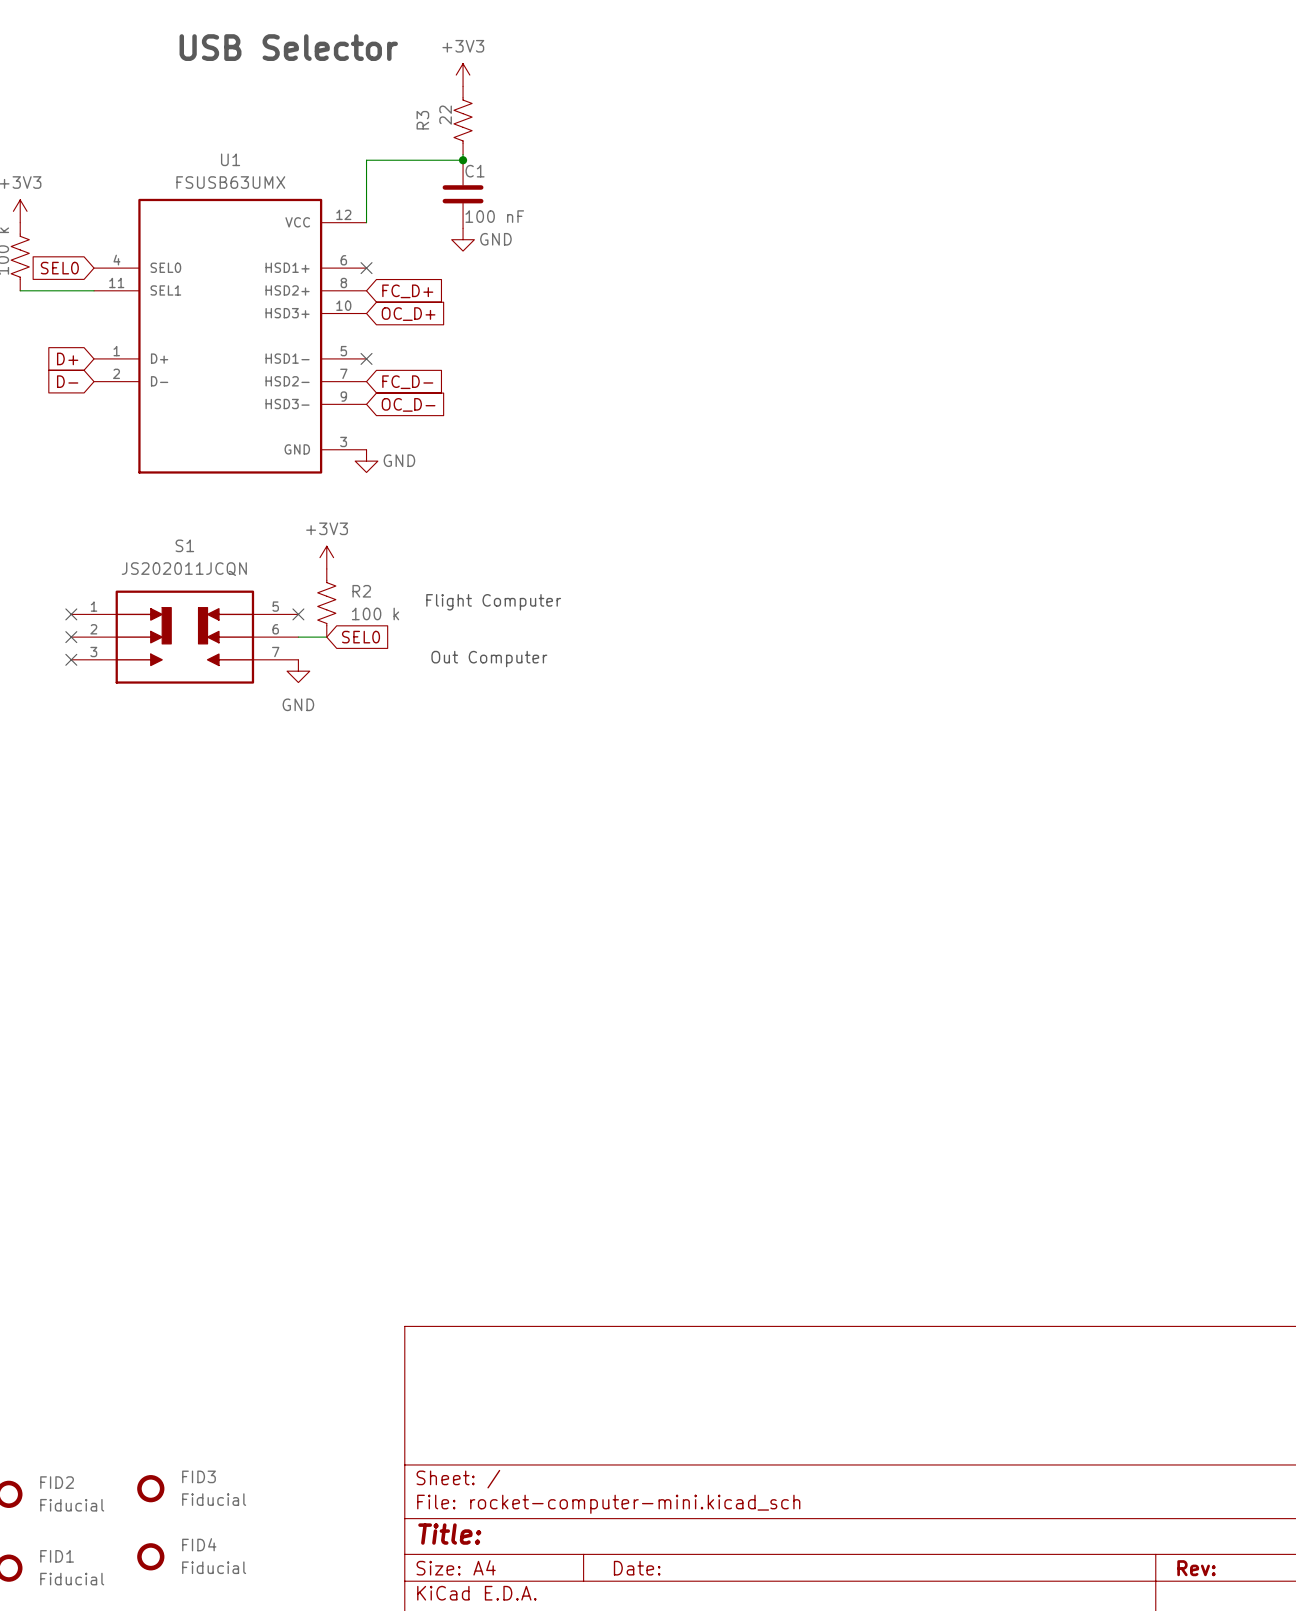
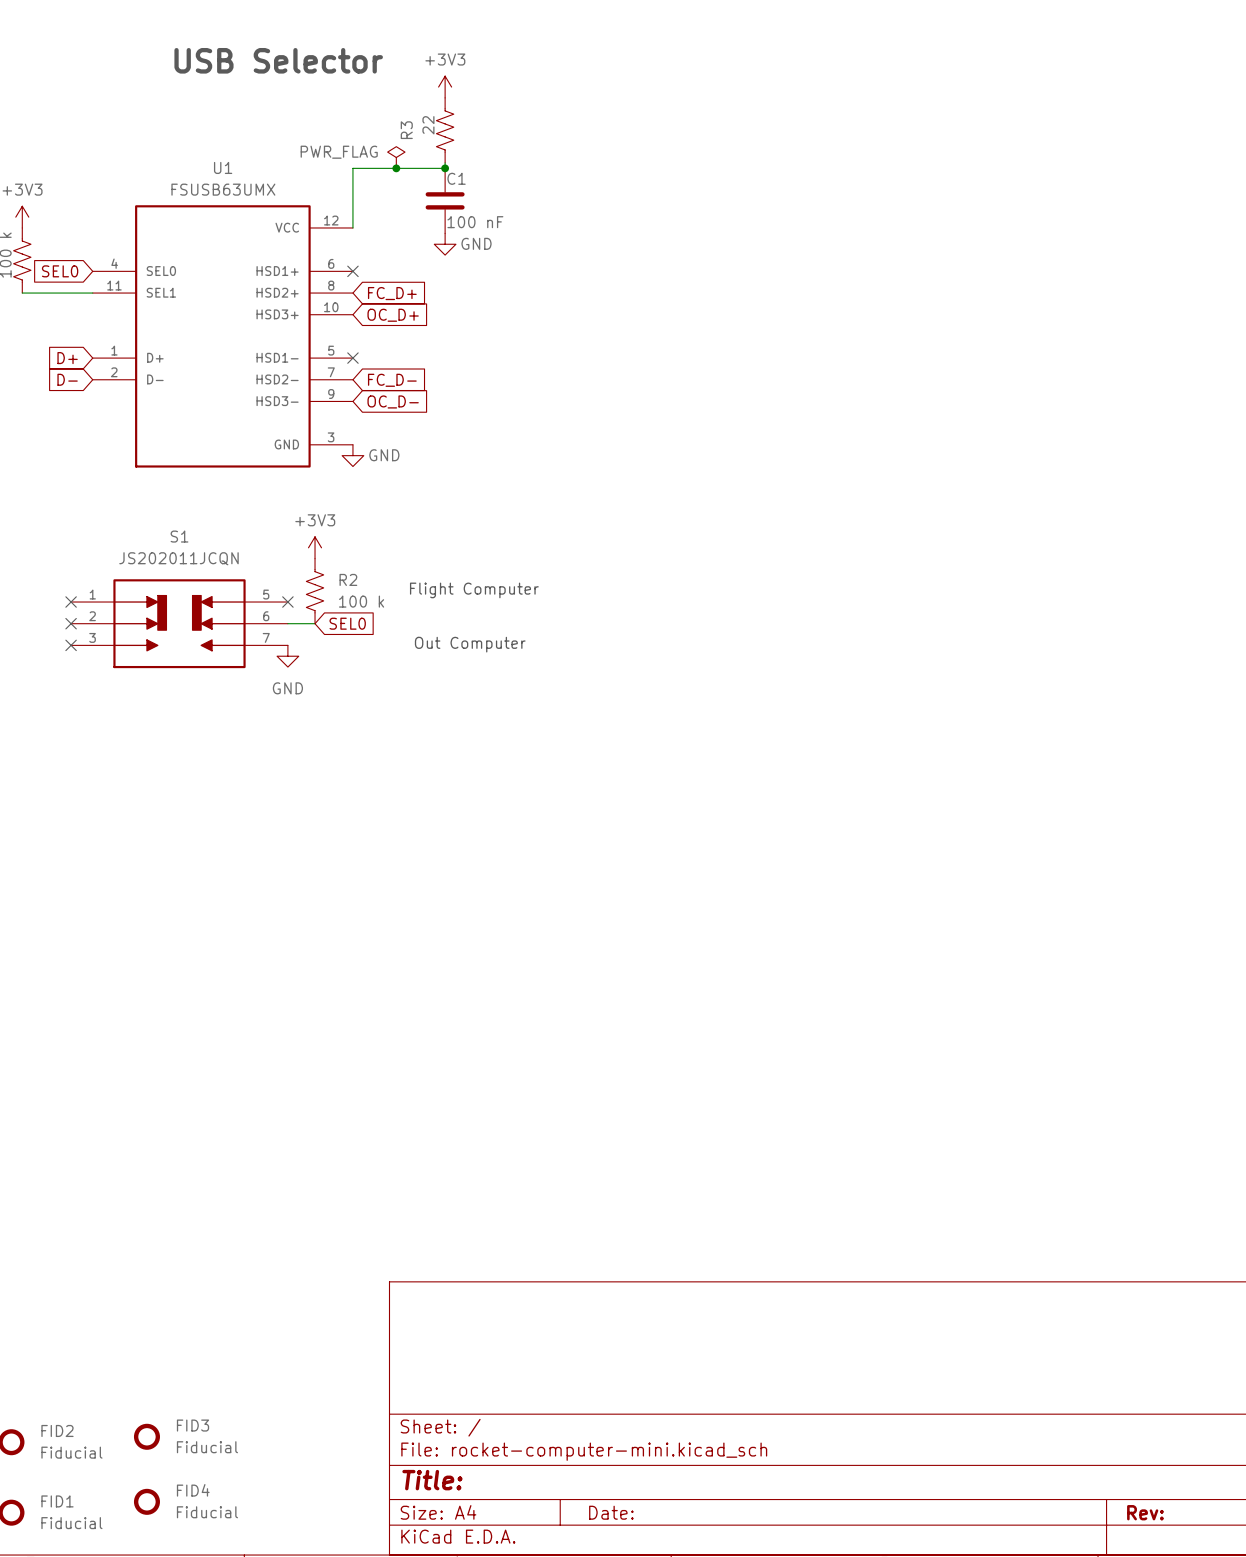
power symbol: none -> PWR_FLAG (396, 157)
junction: none -> (396, 168)

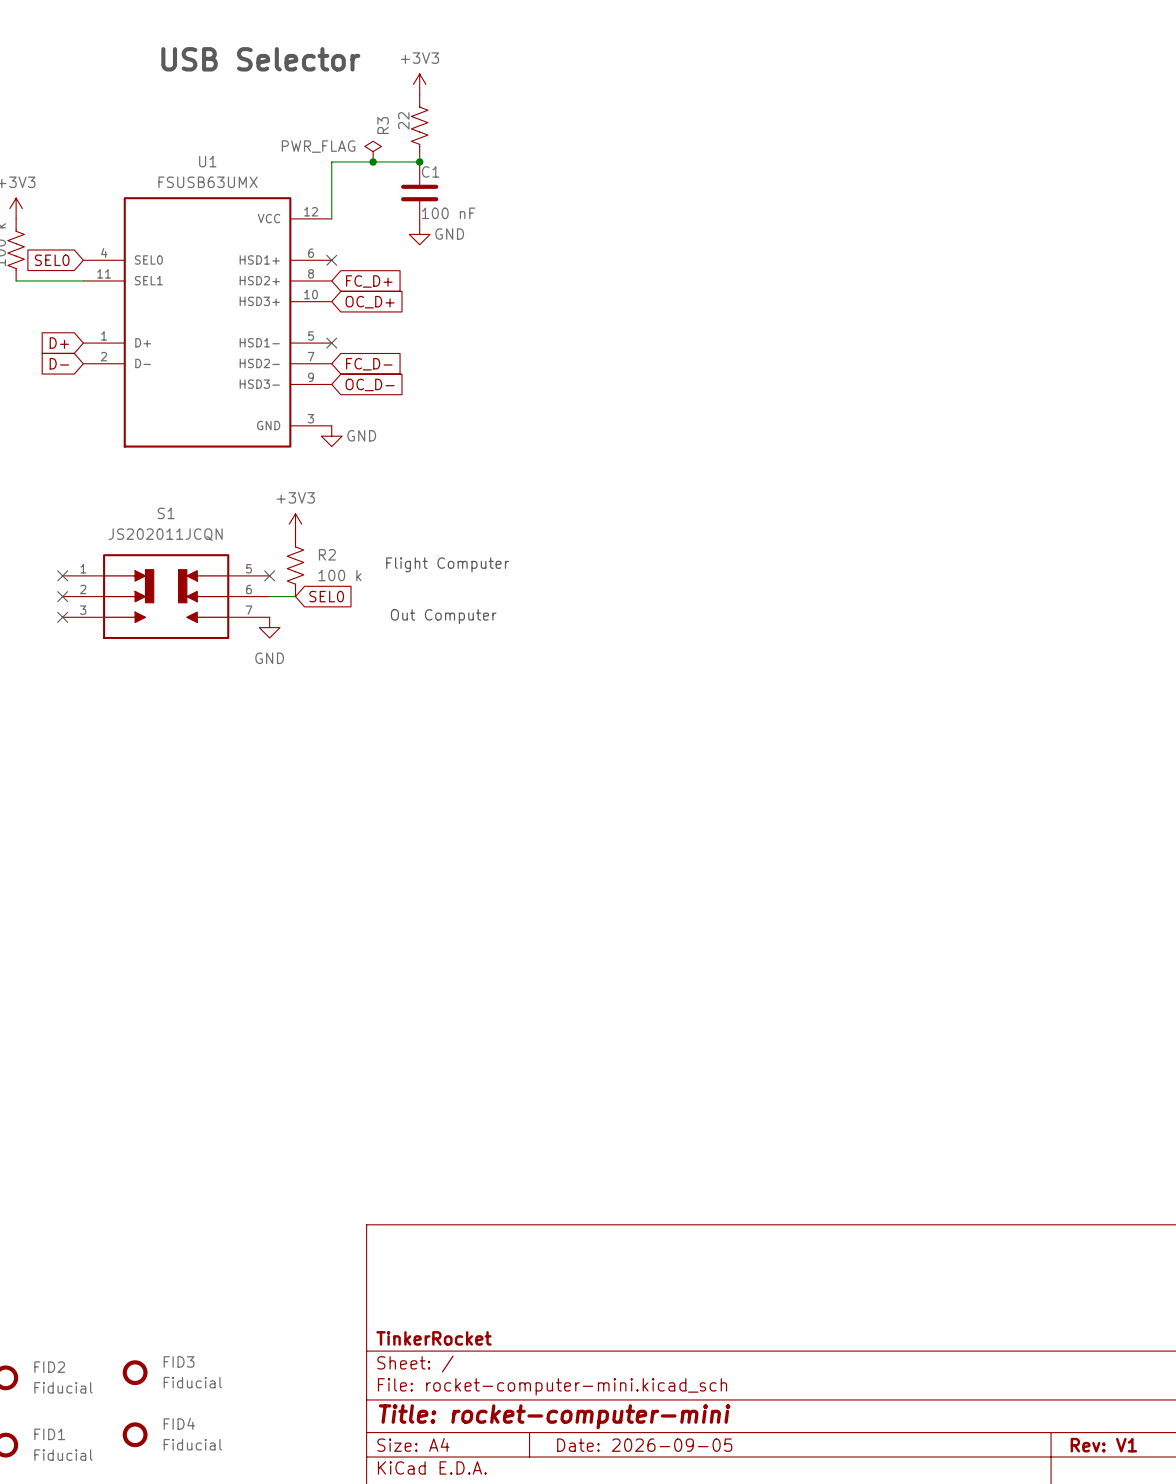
title block: none -> TinkerRocket (433, 1338)
title block: Title: (432, 1480) -> Title: rocket-computer-mini (554, 1416)
title block: Date: (611, 1512) -> Date: 2026-09-05 (644, 1445)
title block: Rev: (1145, 1512) -> Rev: V1 (1103, 1445)

